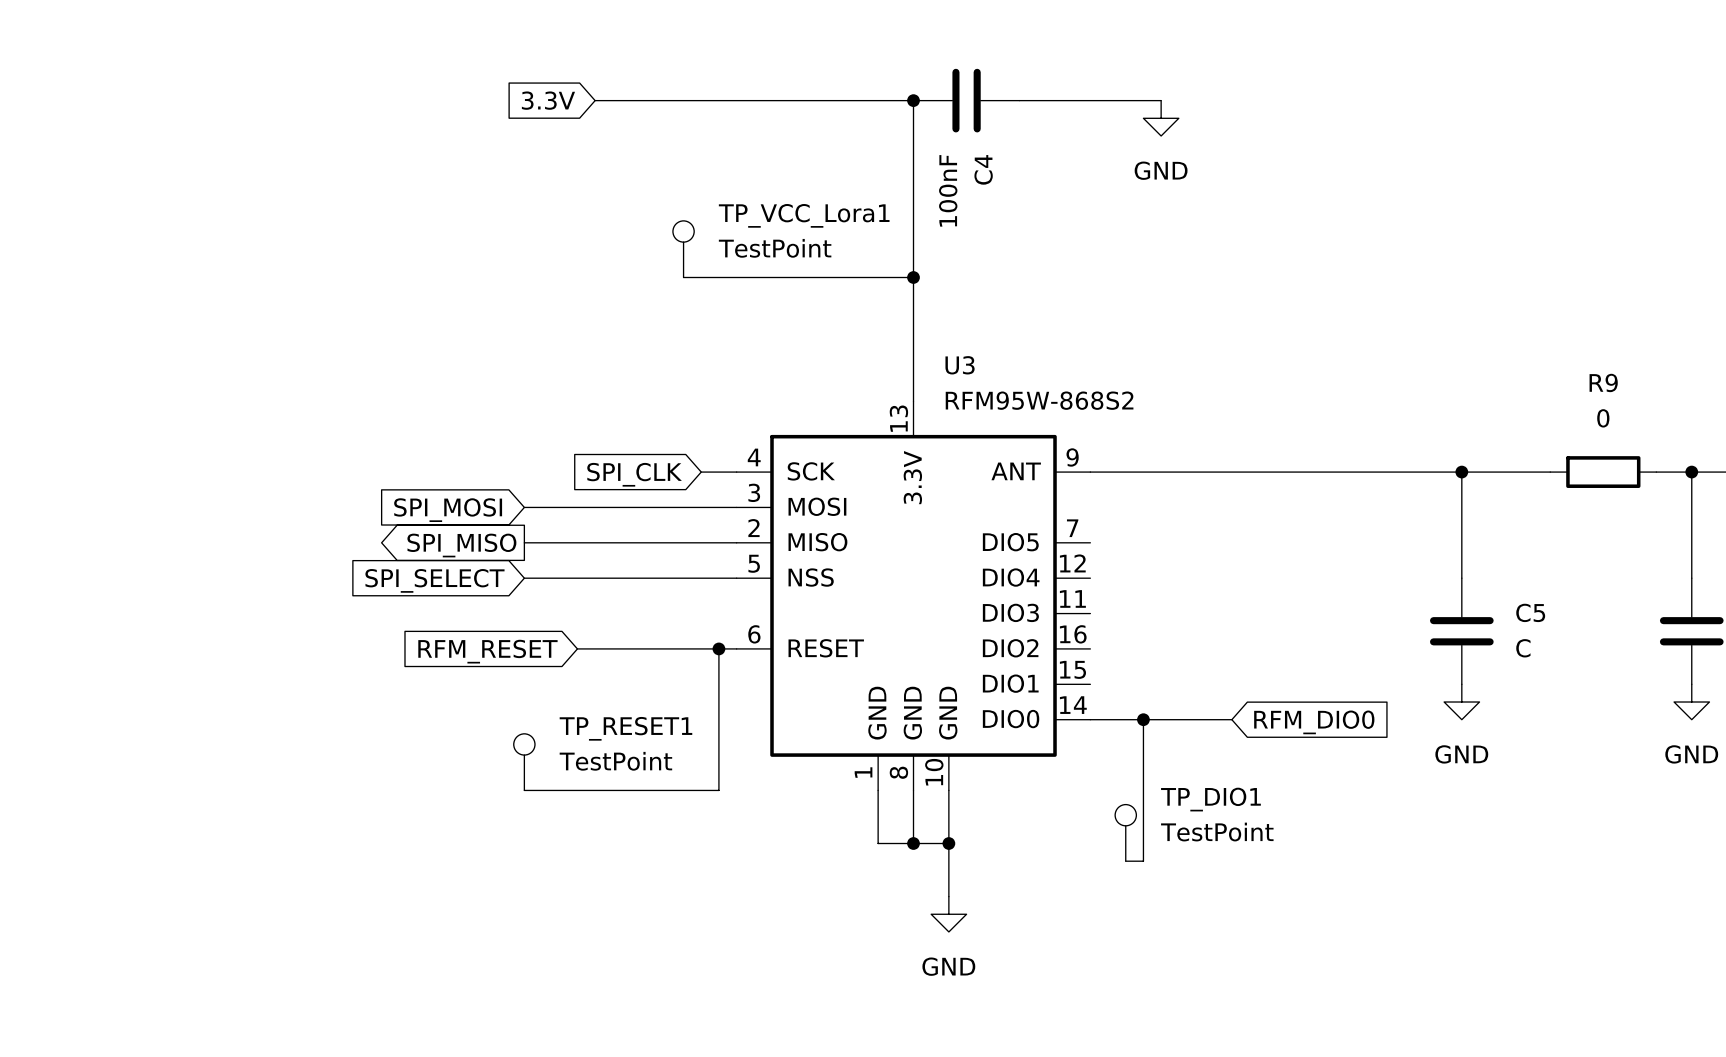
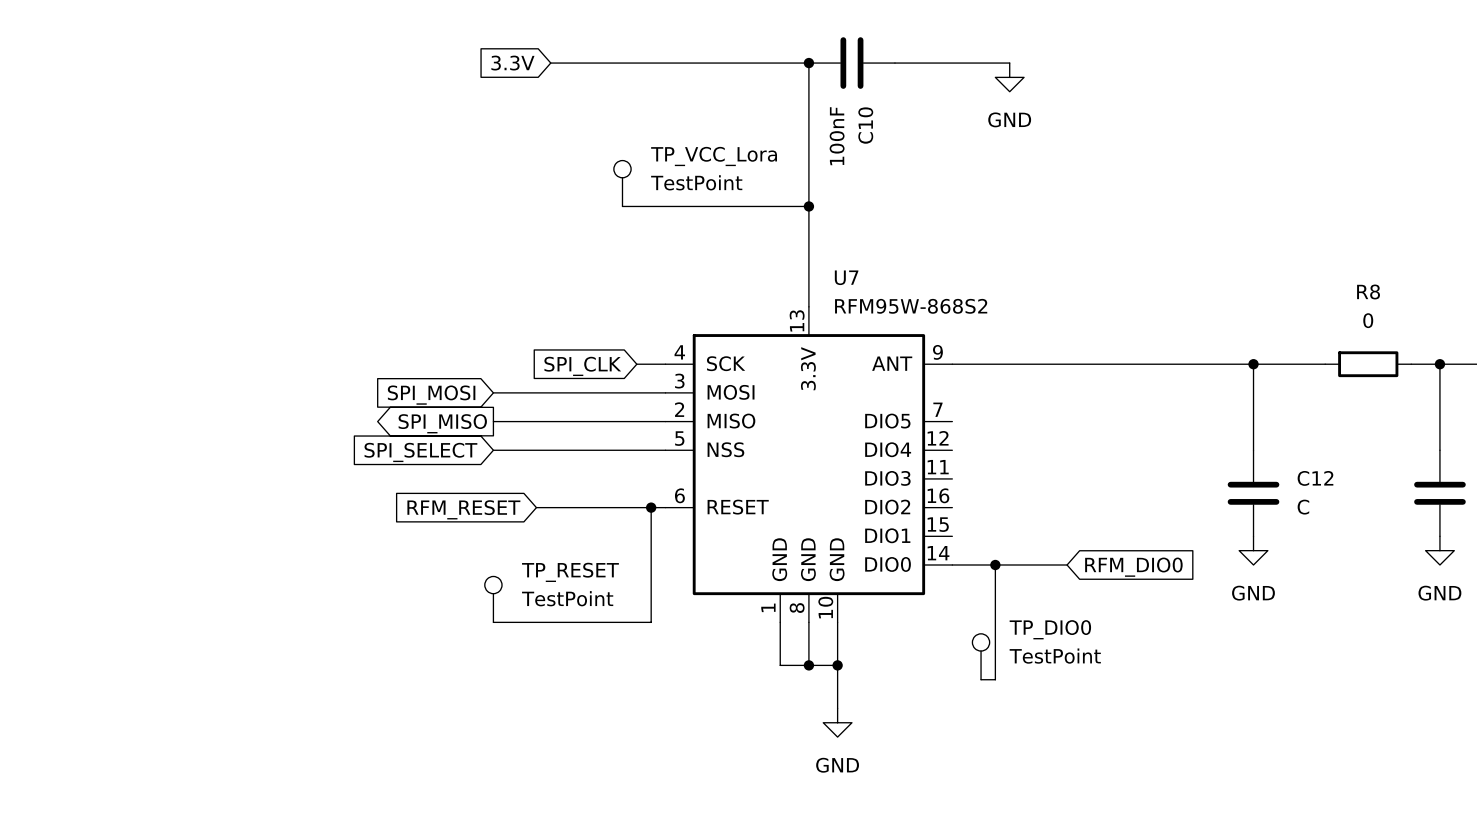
C4 name: C4 (983, 169) -> C10 (865, 125)
TP_VCC_Lora1 name: TP_VCC_Lora1 (804, 215) -> TP_VCC_Lora (714, 156)
U3 name: U3 (960, 365) -> U7 (846, 277)
R9 name: R9 (1603, 382) -> R8 (1368, 291)
C5 name: C5 (1530, 612) -> C12 (1315, 478)
TP_RESET1 name: TP_RESET1 (625, 728) -> TP_RESET (570, 572)
TP_DIO1 name: TP_DIO1 (1210, 799) -> TP_DIO0 (1050, 629)

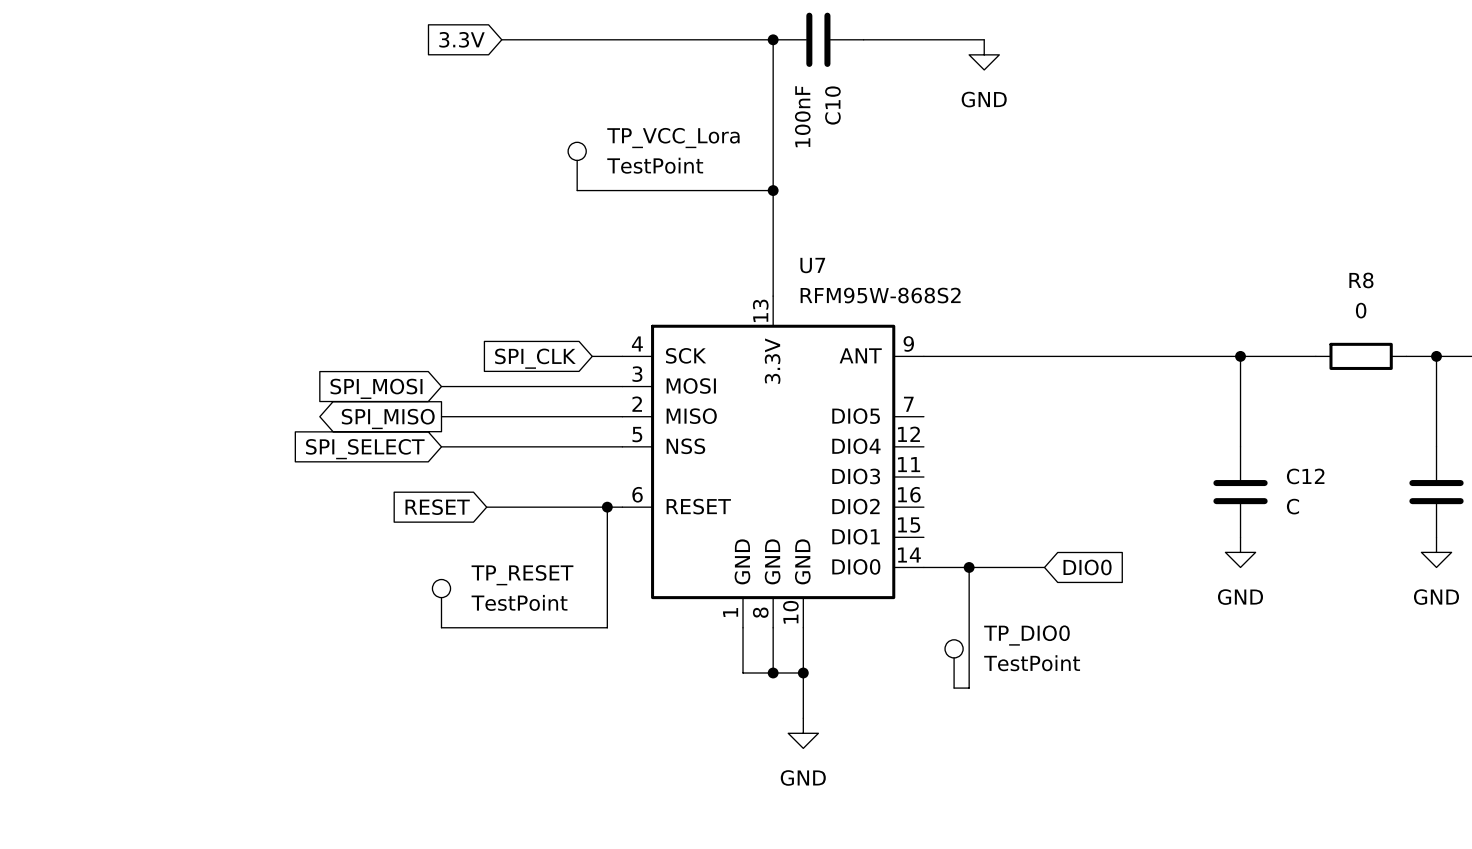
global label: RFM_RESET (463, 509) -> RESET (437, 507)
global label: RFM_DIO0 (1133, 567) -> DIO0 (1087, 567)

